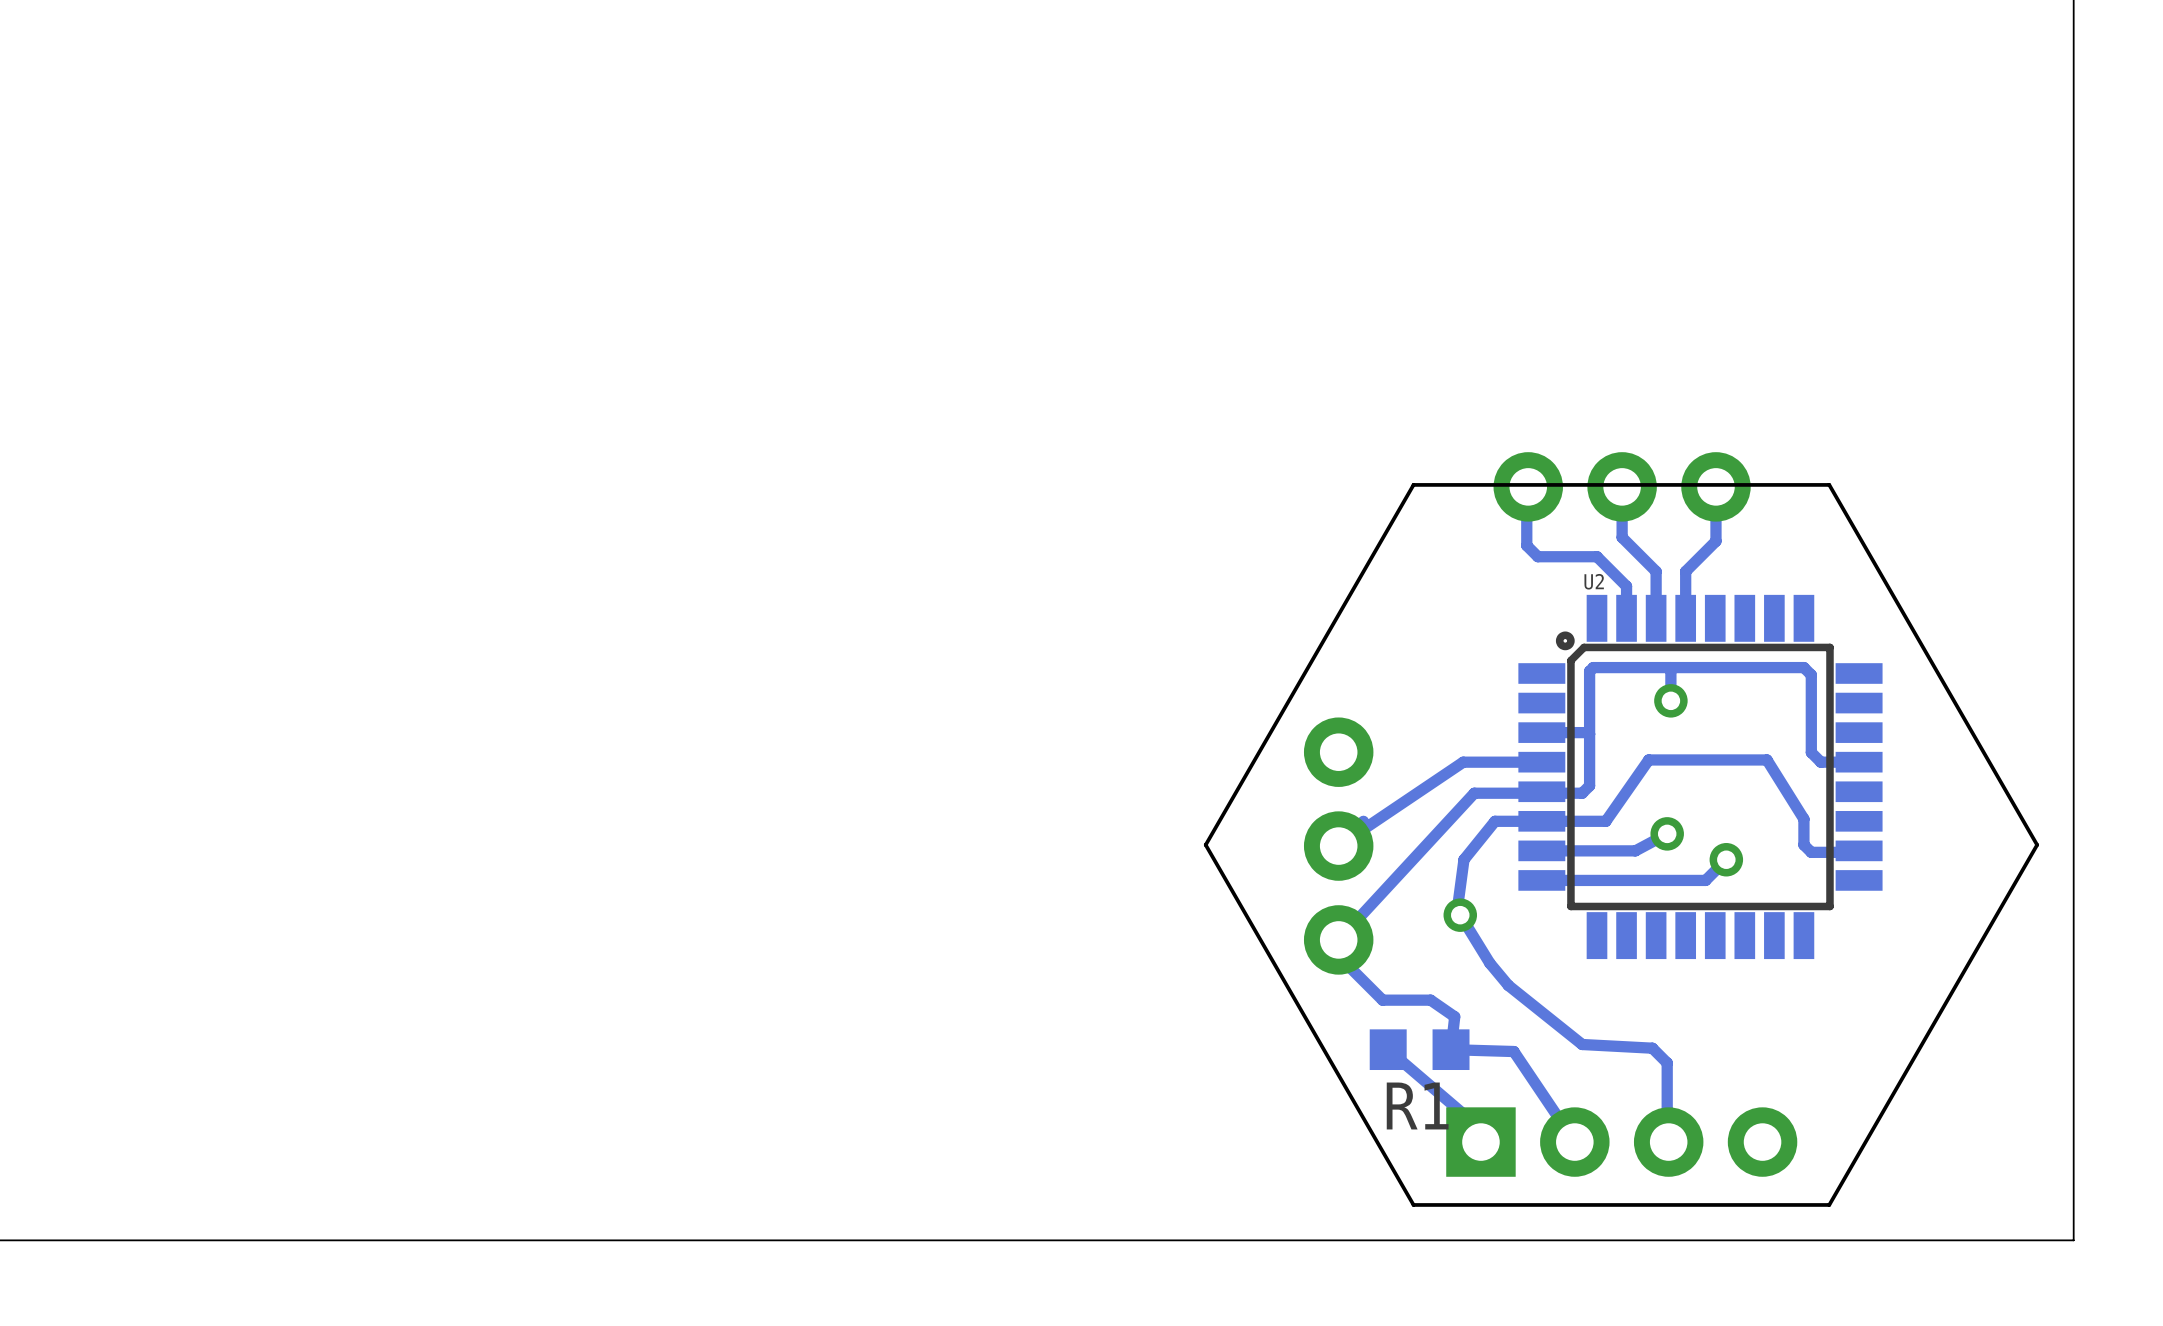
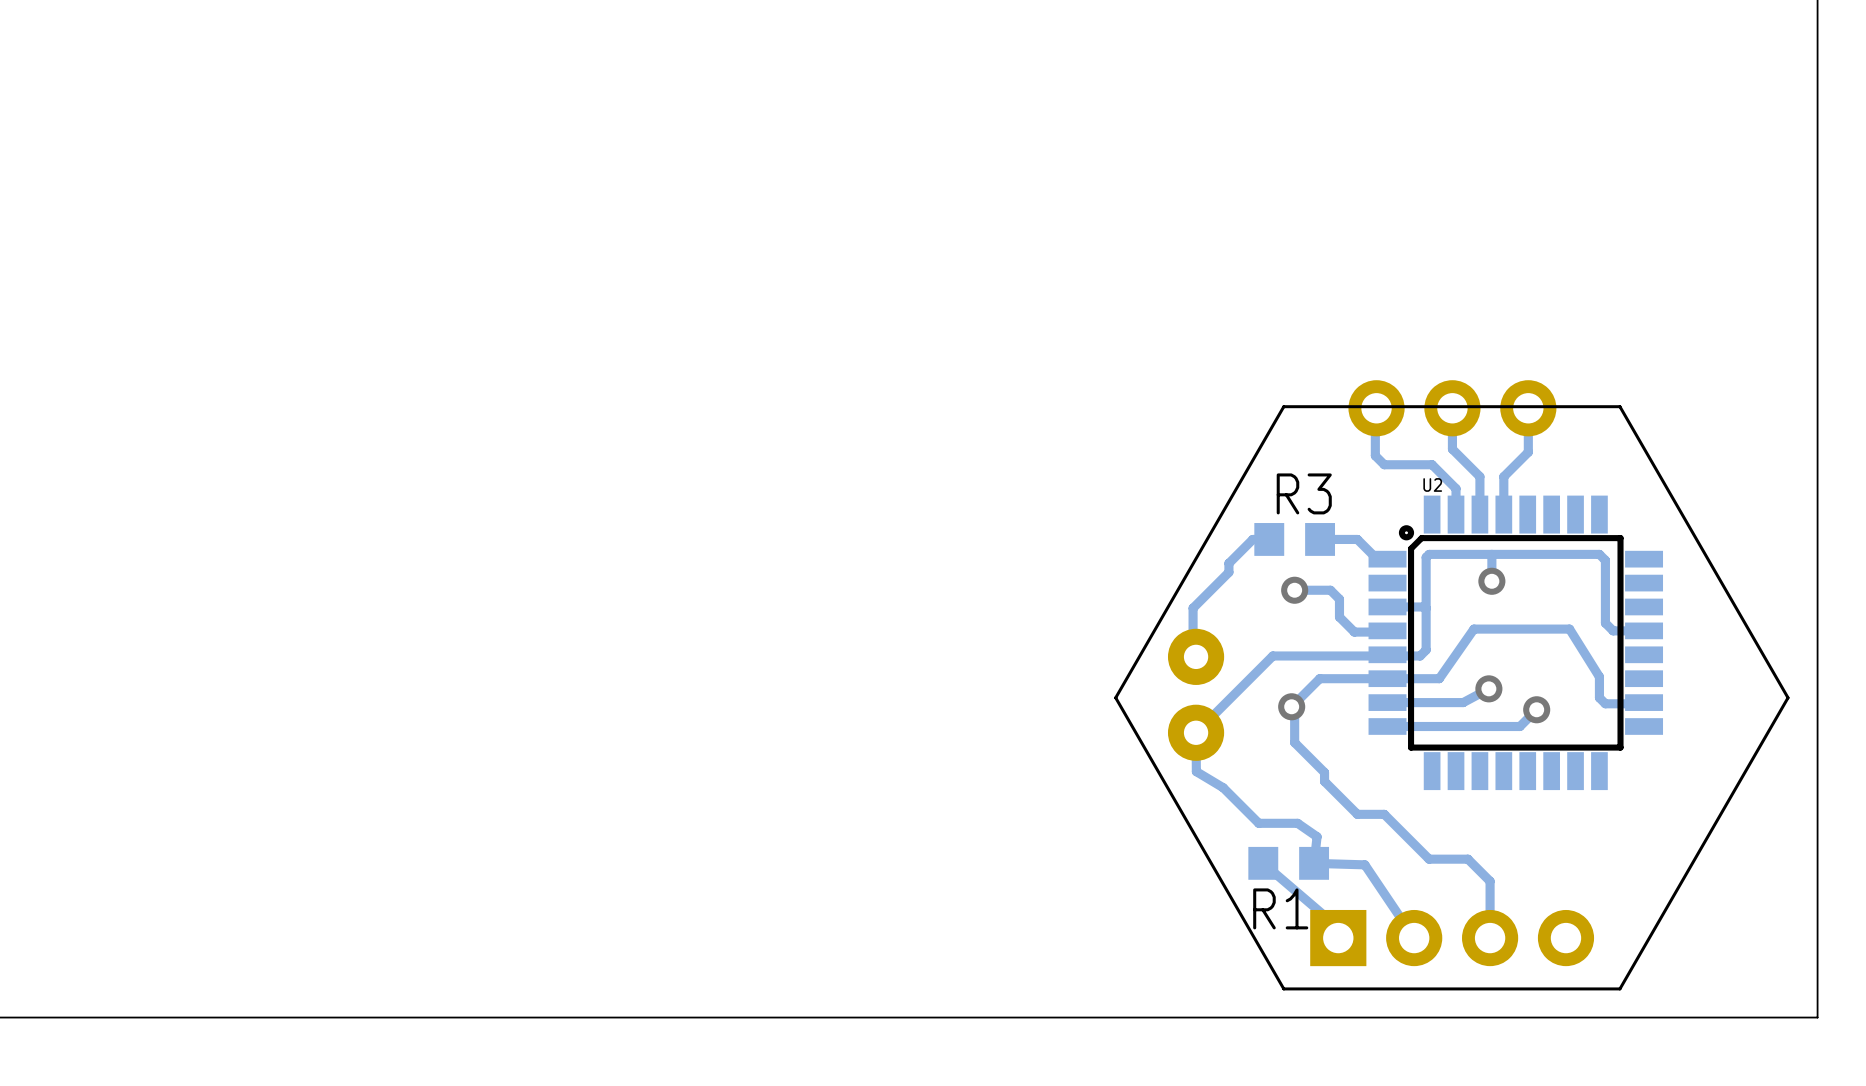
track: none -> (1269, 539) (1252, 539) (1228, 563) (1228, 572) (1193, 608) (1193, 653) (1196, 656)
R3: none -> (1294, 539)
track: none -> (1320, 539) (1357, 539) (1377, 559) (1387, 559)
via: none -> (1294, 590)
part footprint: [1303, 717, 1374, 975] -> [1167, 628, 1225, 761]
track: (1541, 762) (1463, 762) (1338, 846) (1363, 821) -> (1387, 630) (1354, 632) (1339, 617) (1339, 599) (1330, 590) (1294, 590)
track: (1474, 793) (1338, 939) (1338, 956) -> (1332, 655) (1272, 655) (1196, 732) (1196, 771) (1223, 787)
track: (1495, 821) (1463, 859) (1456, 915) (1460, 915) (1489, 963) (1508, 985) (1582, 1044) (1652, 1048) (1667, 1062) (1668, 1142) -> (1349, 678) (1319, 678) (1291, 706) (1294, 709) (1294, 742) (1324, 772) (1324, 781) (1357, 814) (1384, 814) (1429, 859) (1467, 859) (1490, 881) (1490, 938)
via position: (1460, 915) -> (1291, 706)

